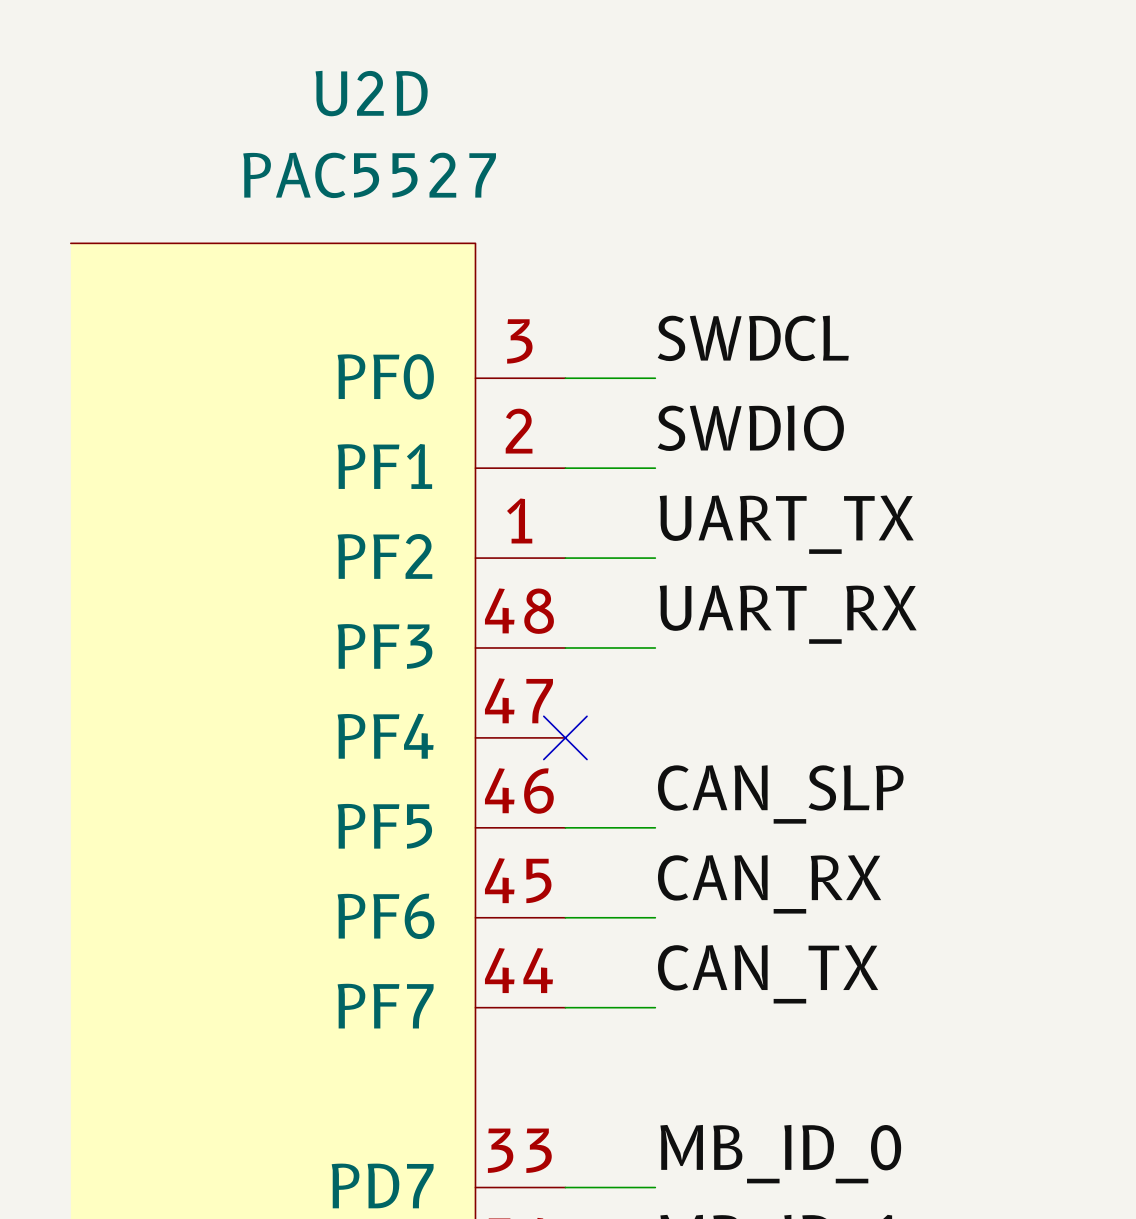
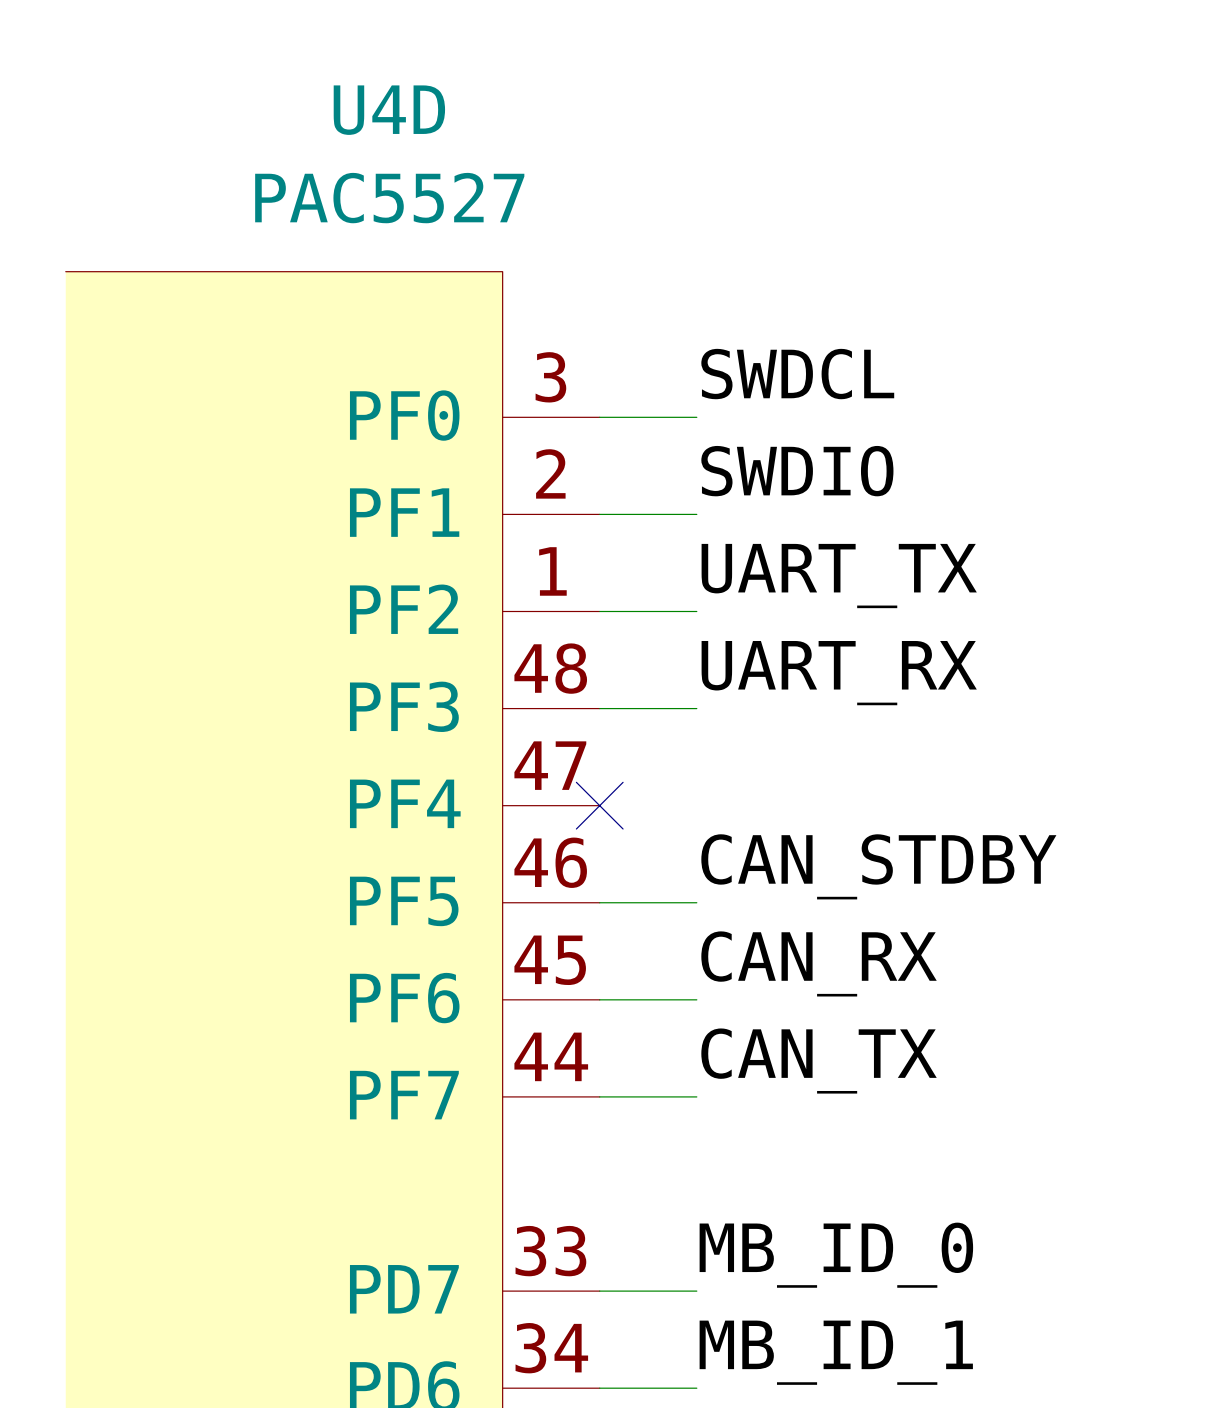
U2D name: U2D (371, 93) -> U4D (389, 110)
label: CAN_SLP (780, 794) -> CAN_STDBY (878, 866)

